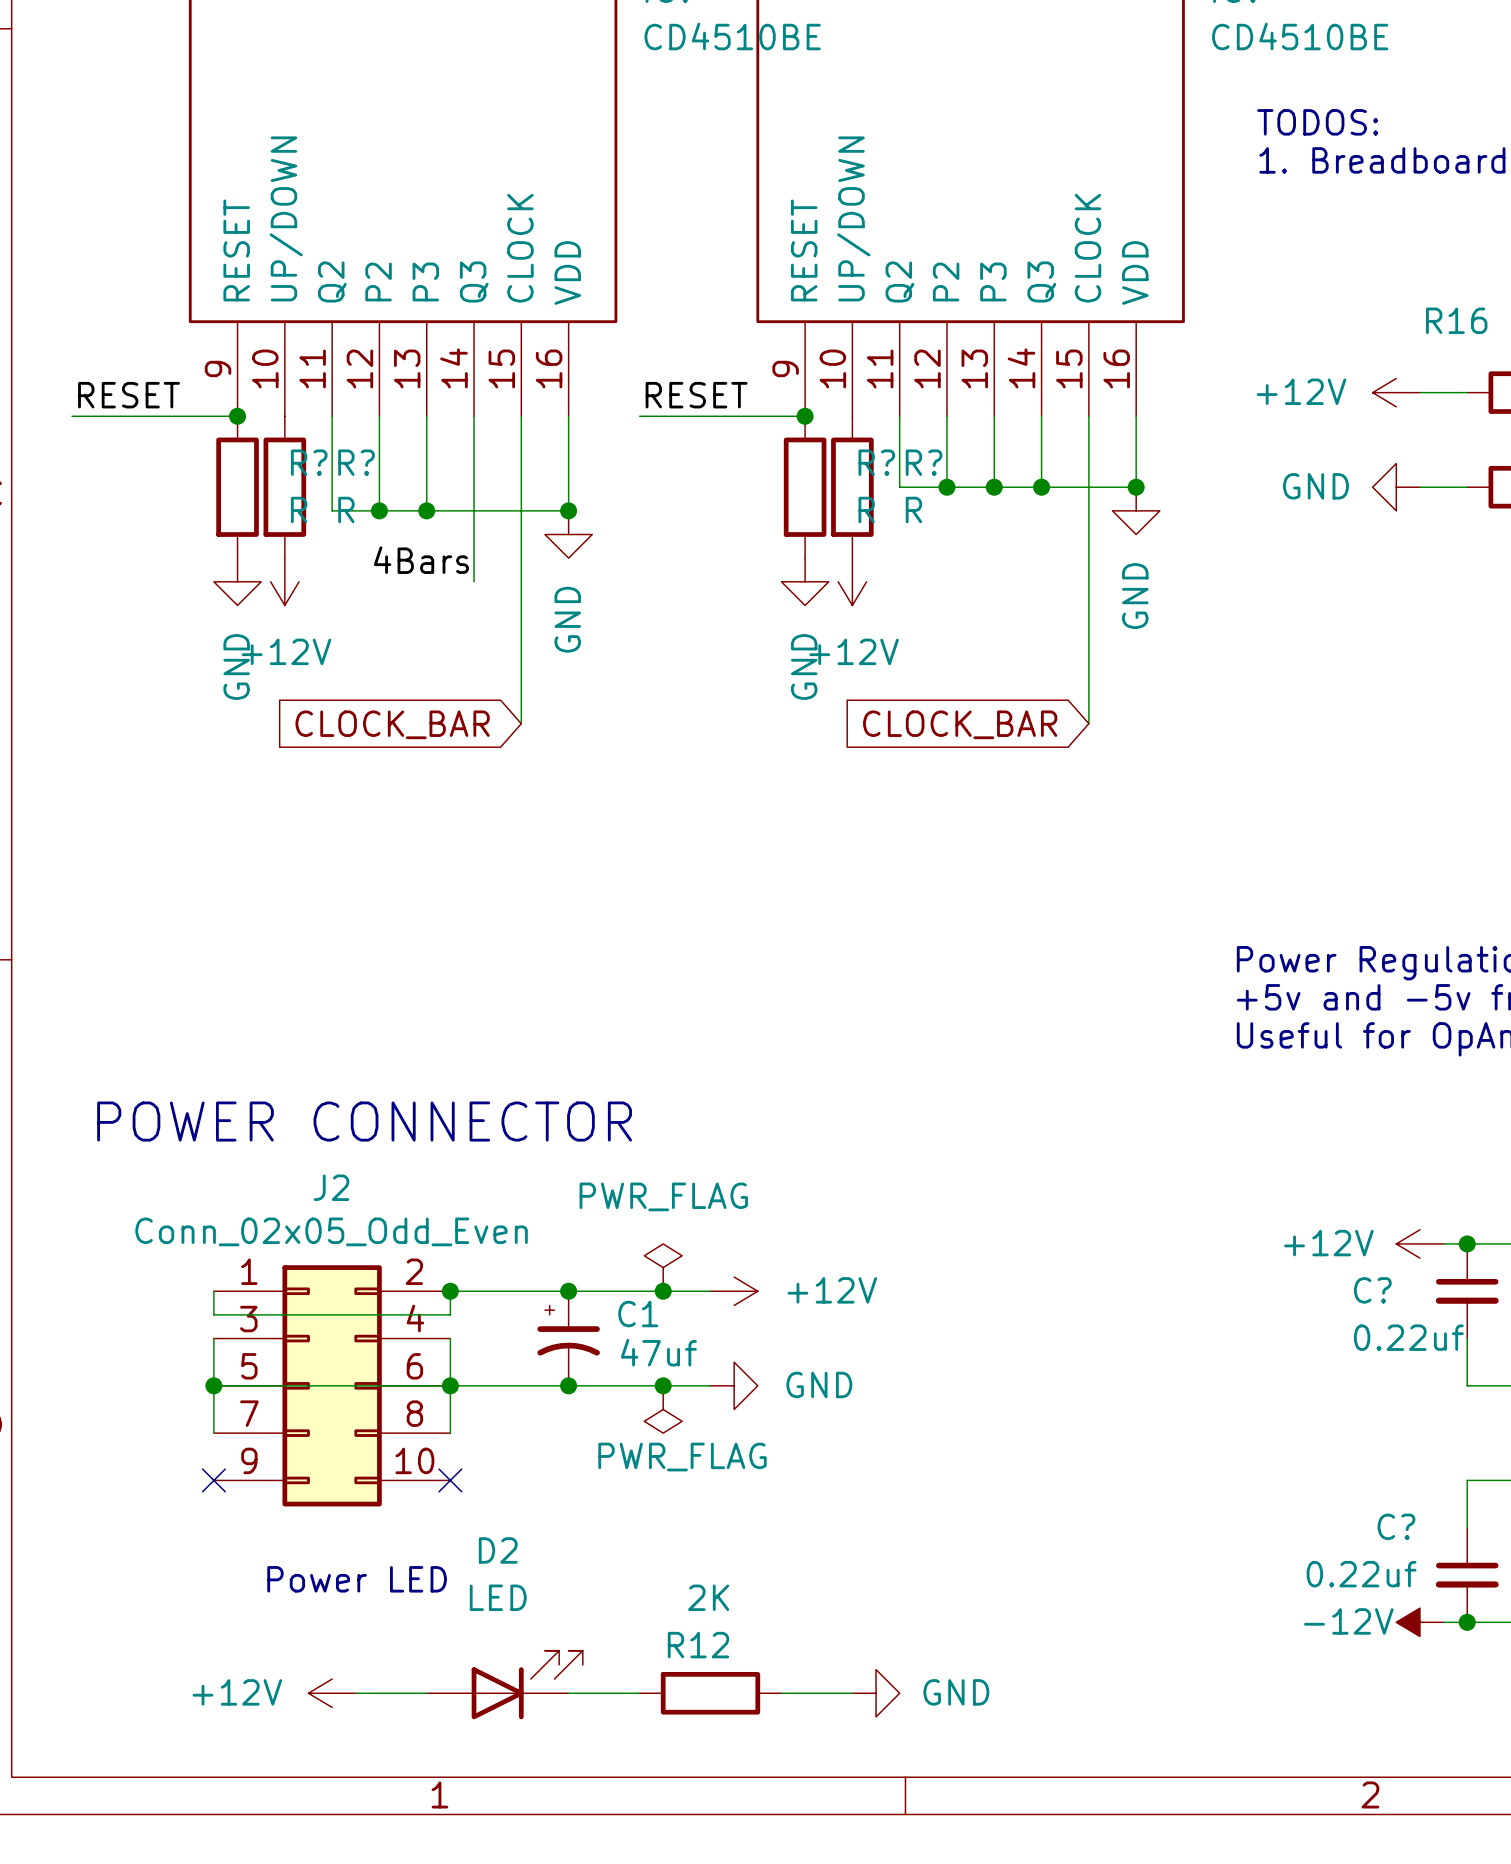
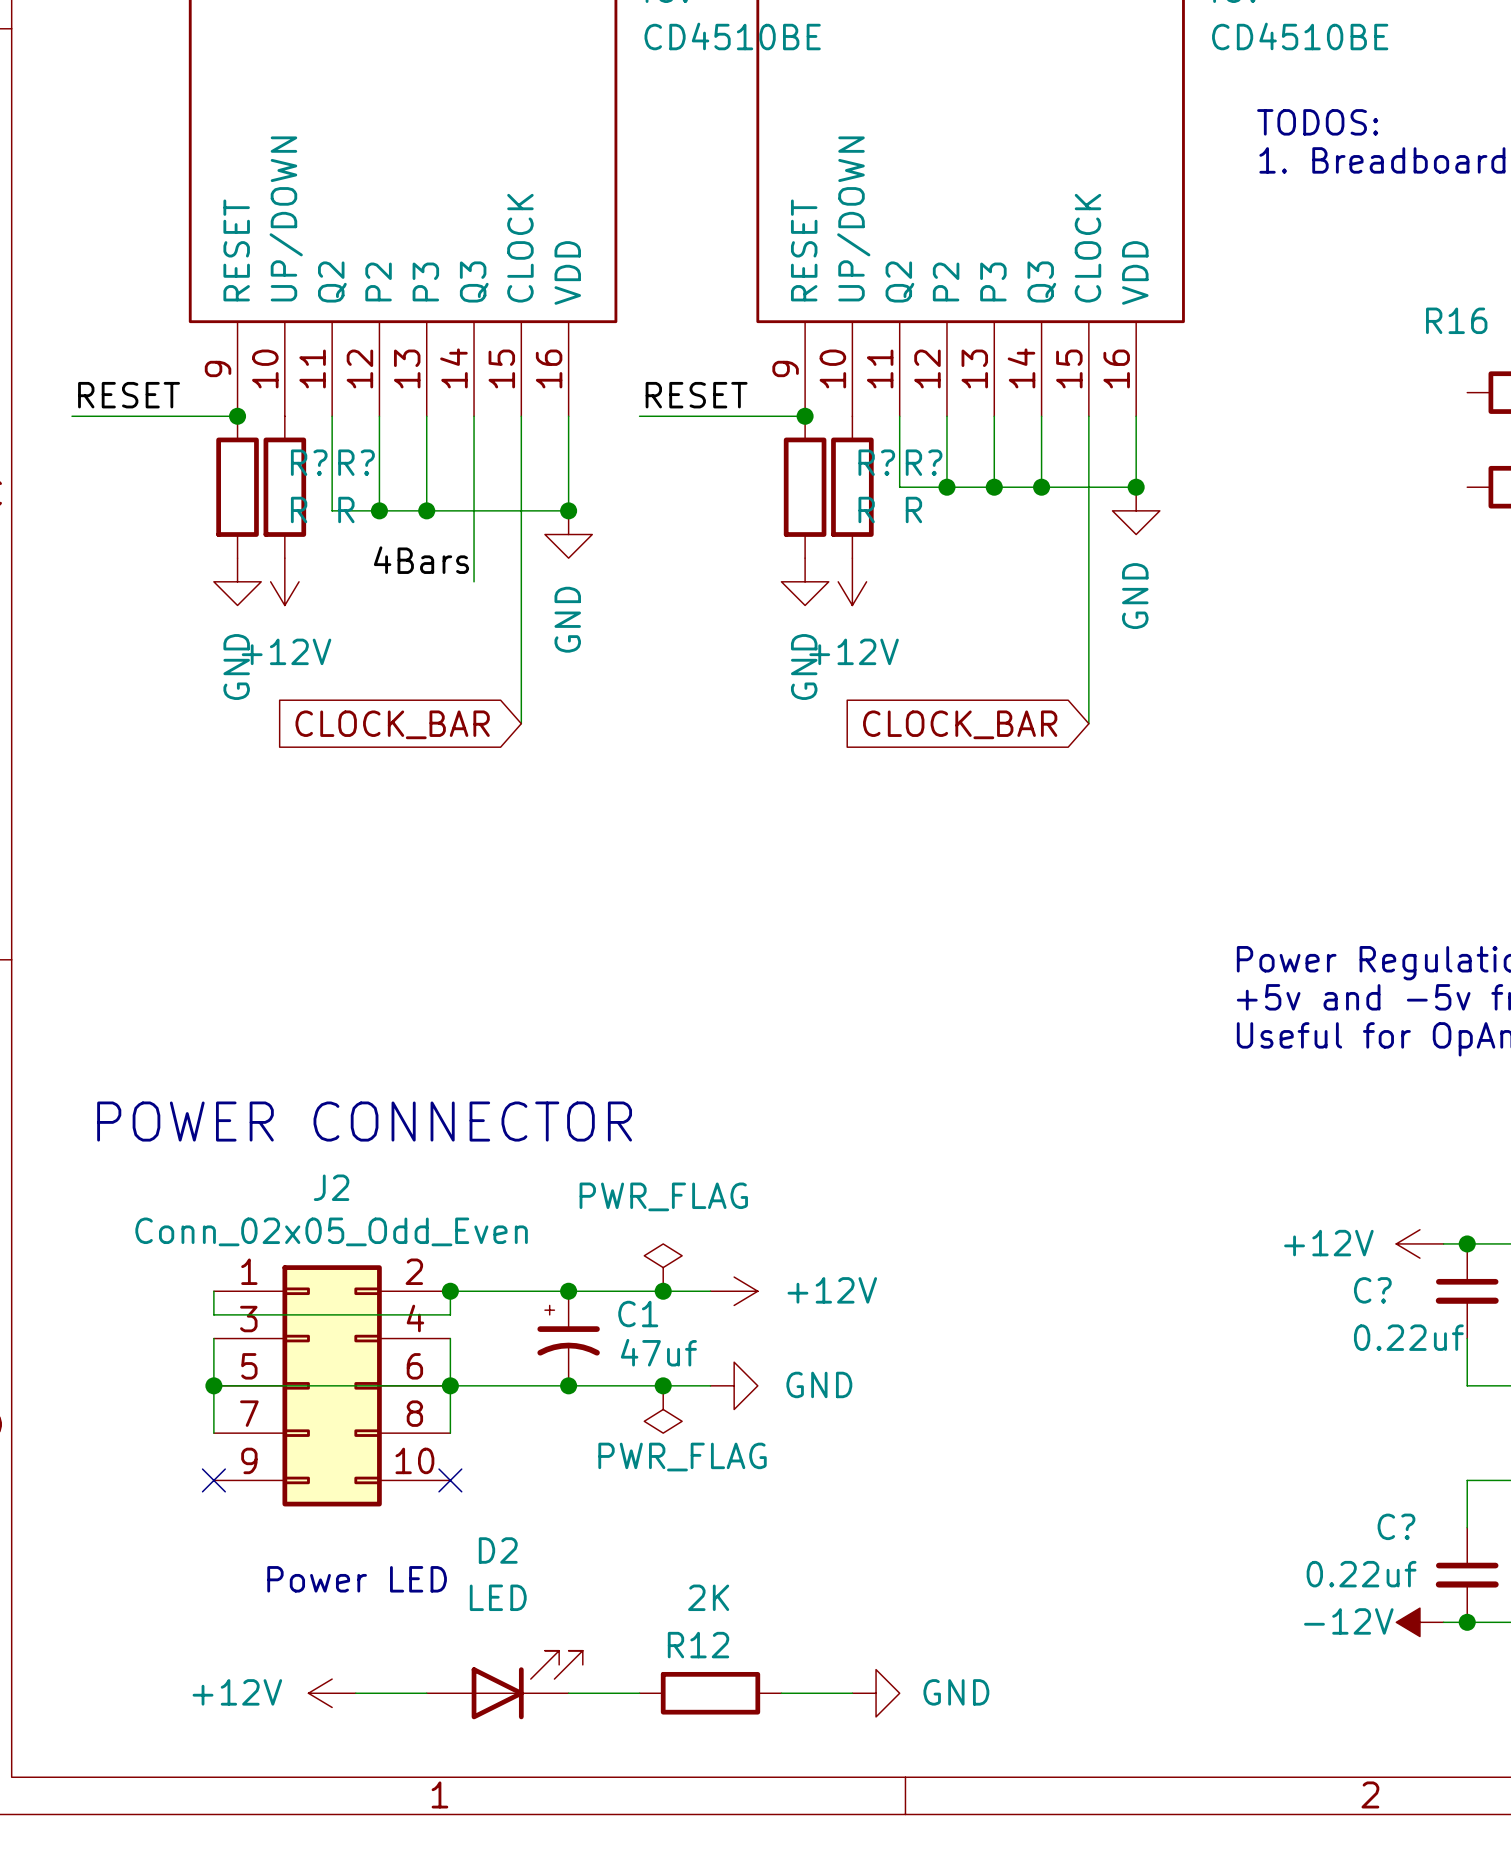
power symbol: +12V (1396, 392) -> none
wire: (1419, 392) (1467, 392) -> none
power symbol: GND (1396, 487) -> none
wire: (1419, 487) (1467, 487) -> none

